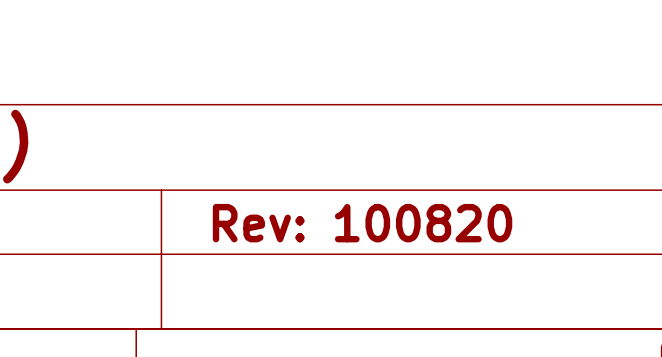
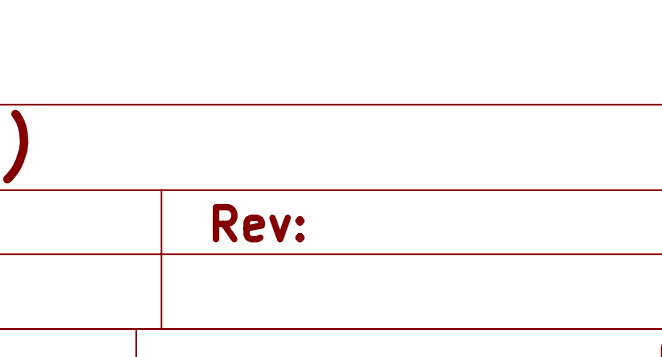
title block: Rev: 100820 (362, 223) -> Rev: (258, 223)

